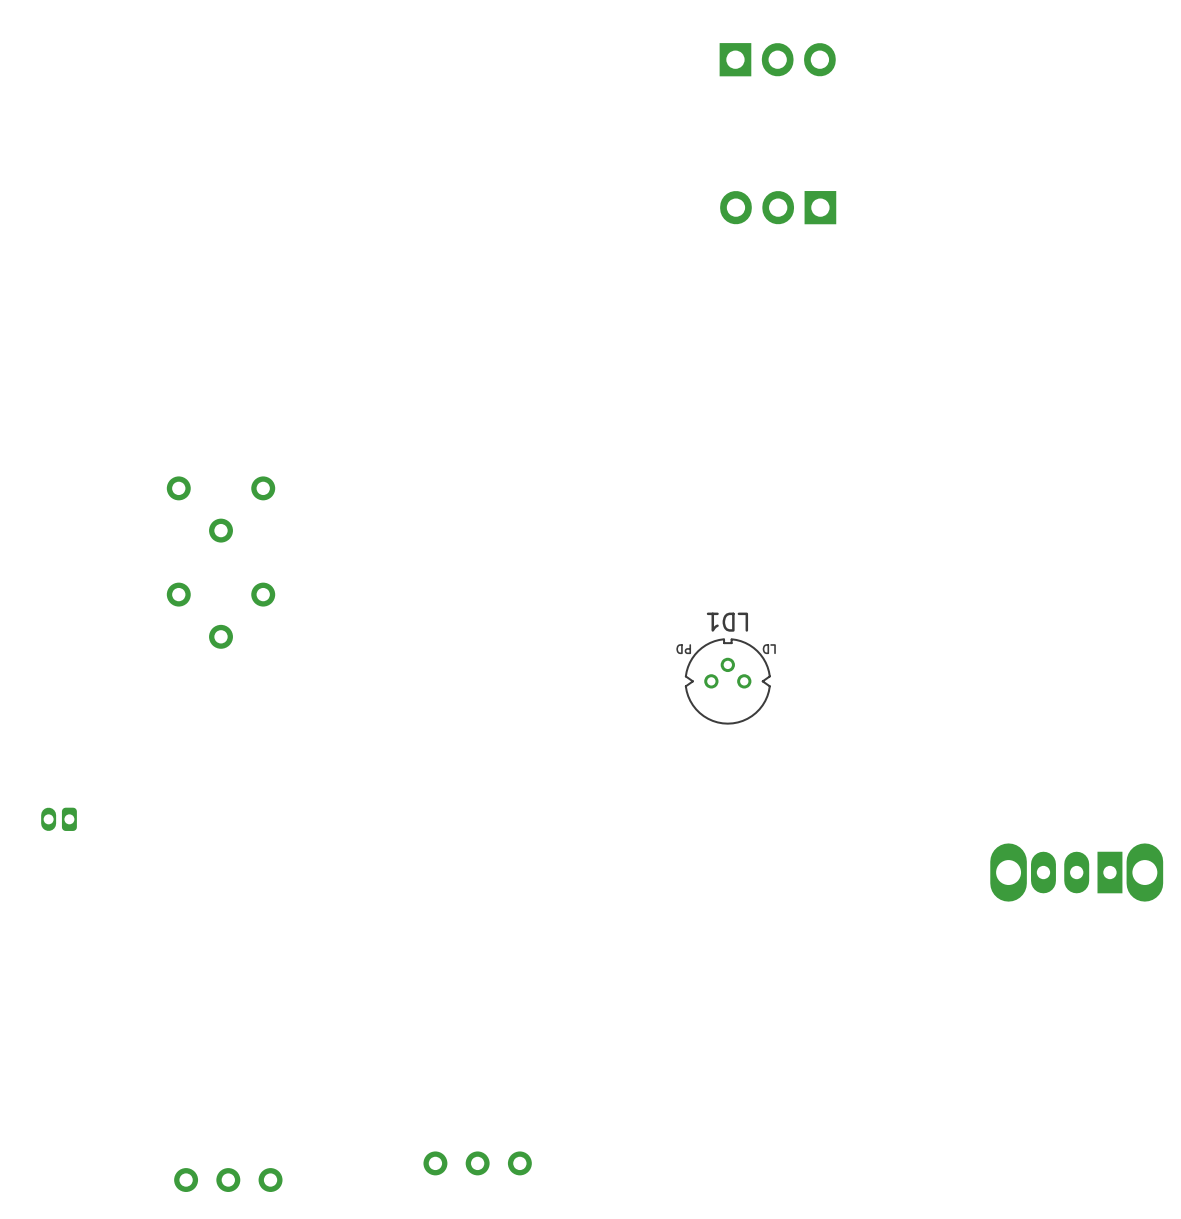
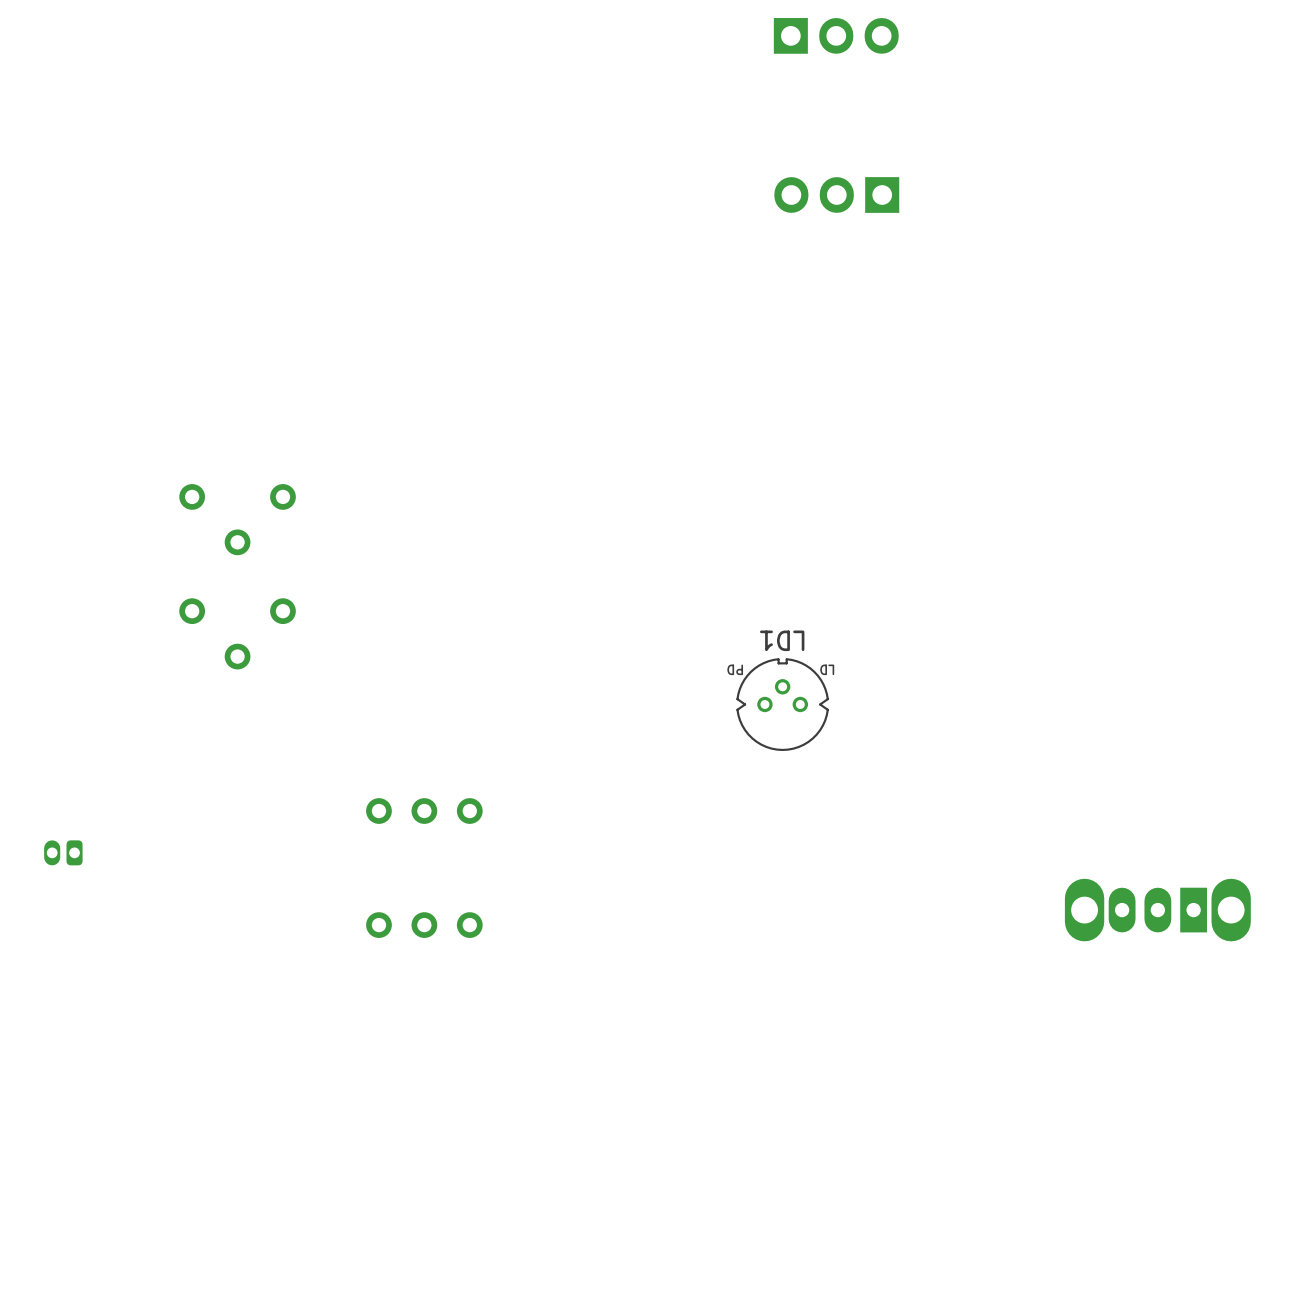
part: none -> (424, 811)
part: none -> (424, 925)
part: (477, 1163) -> none
part: (228, 1180) -> none

